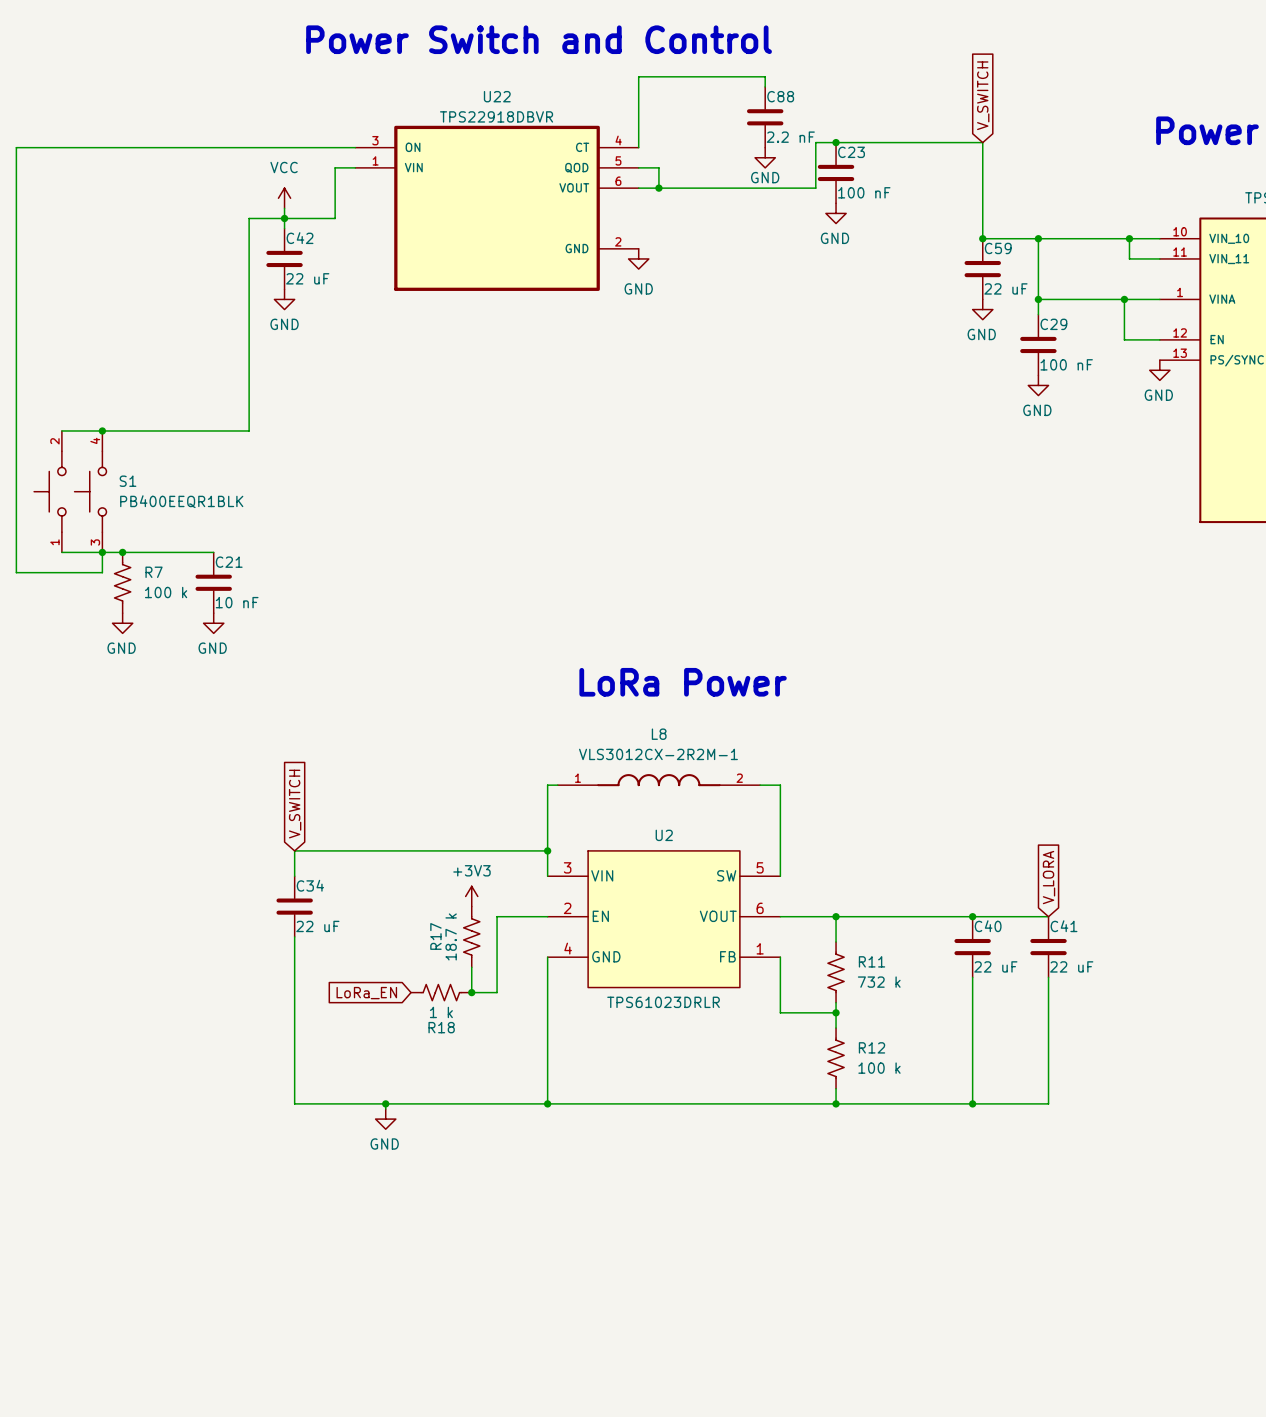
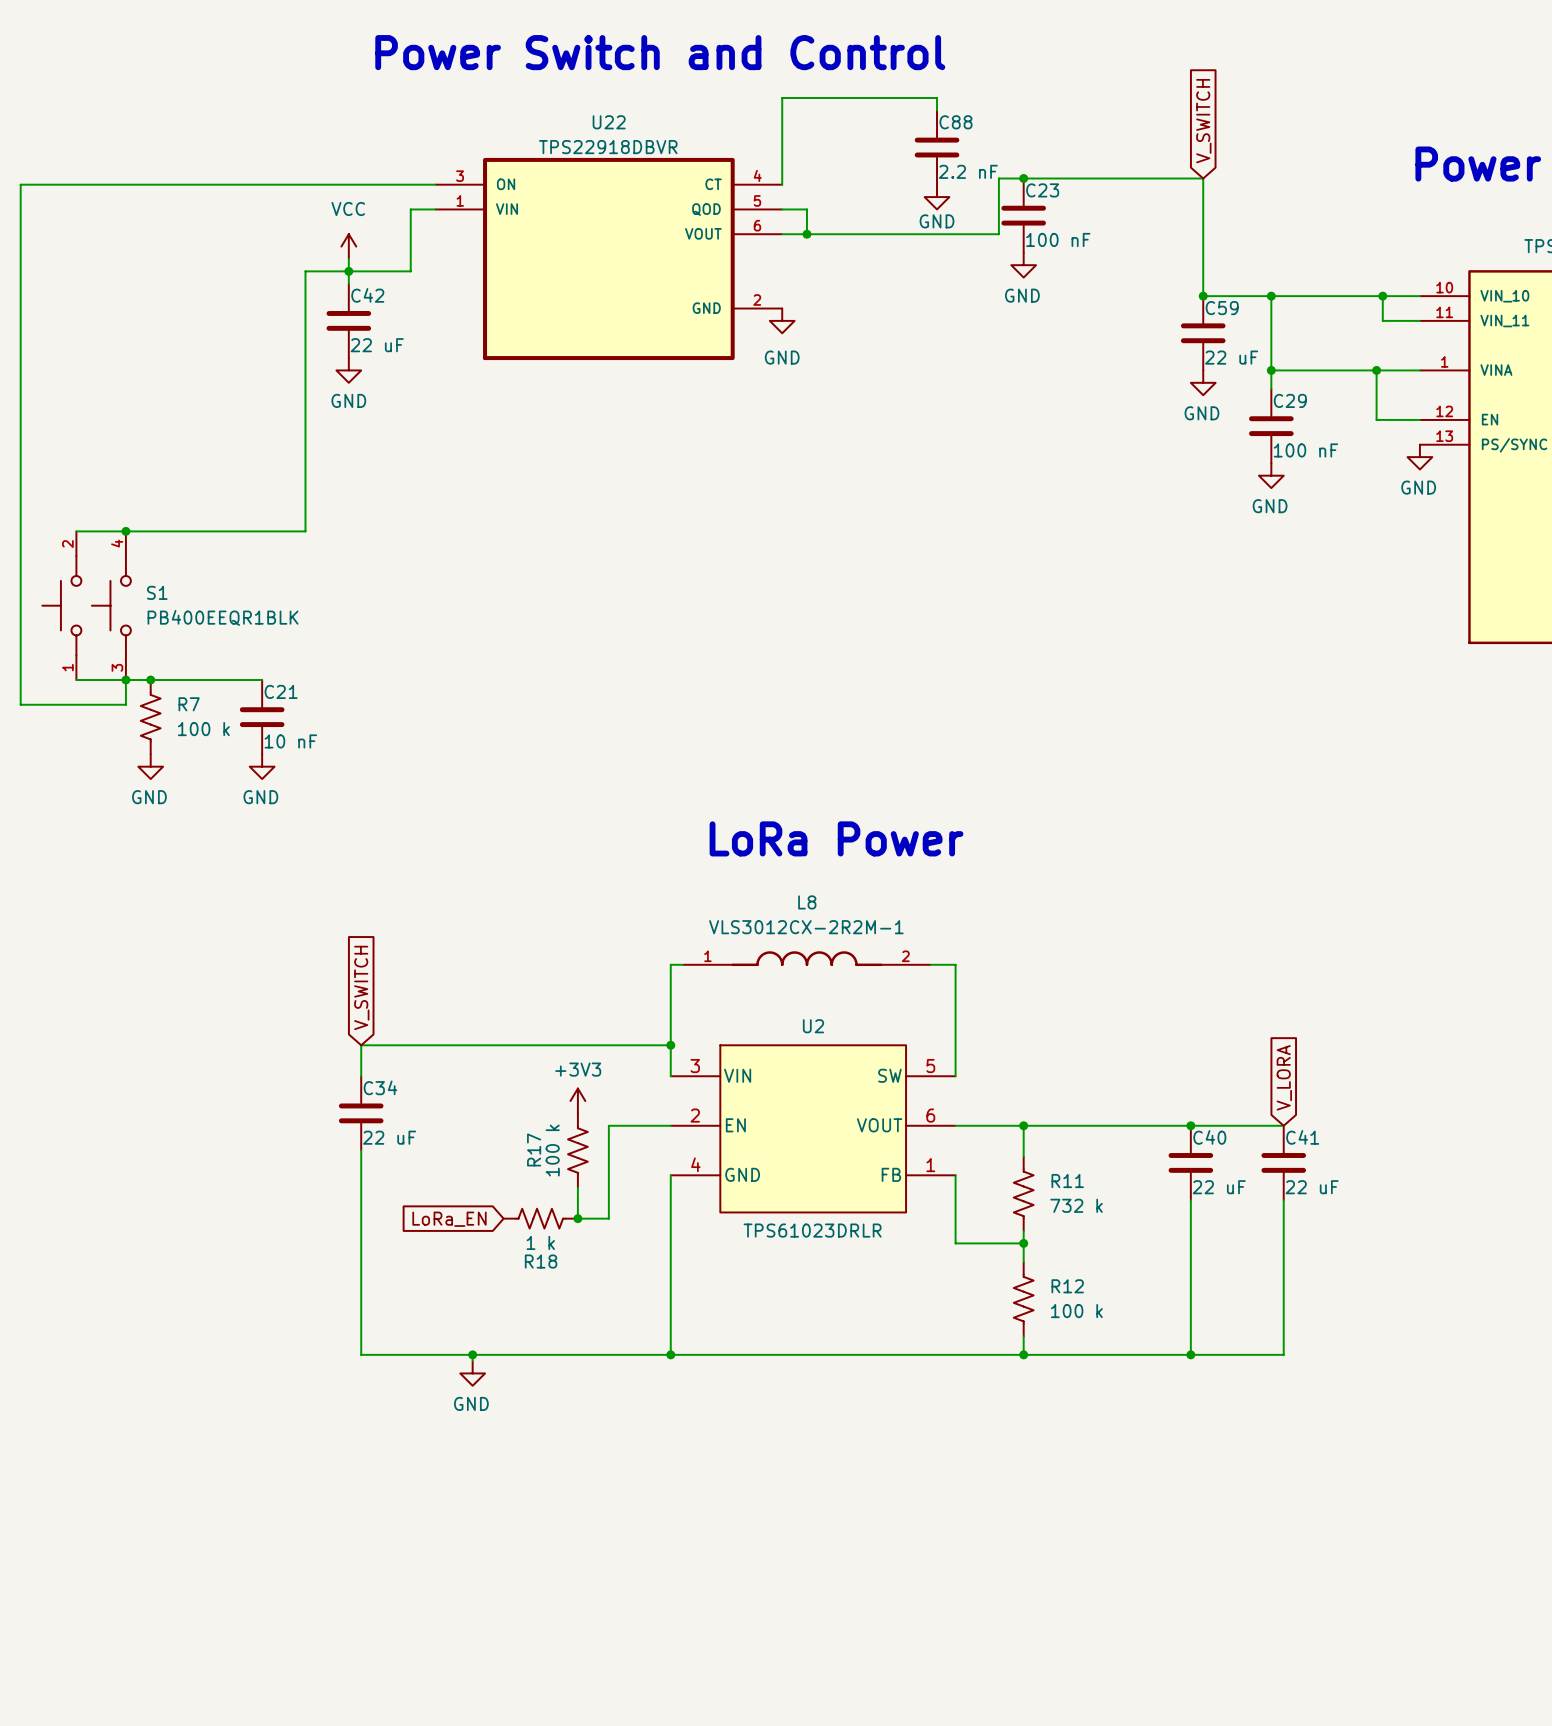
R17 value: 18.7 k (451, 936) -> 100 k (552, 1150)

